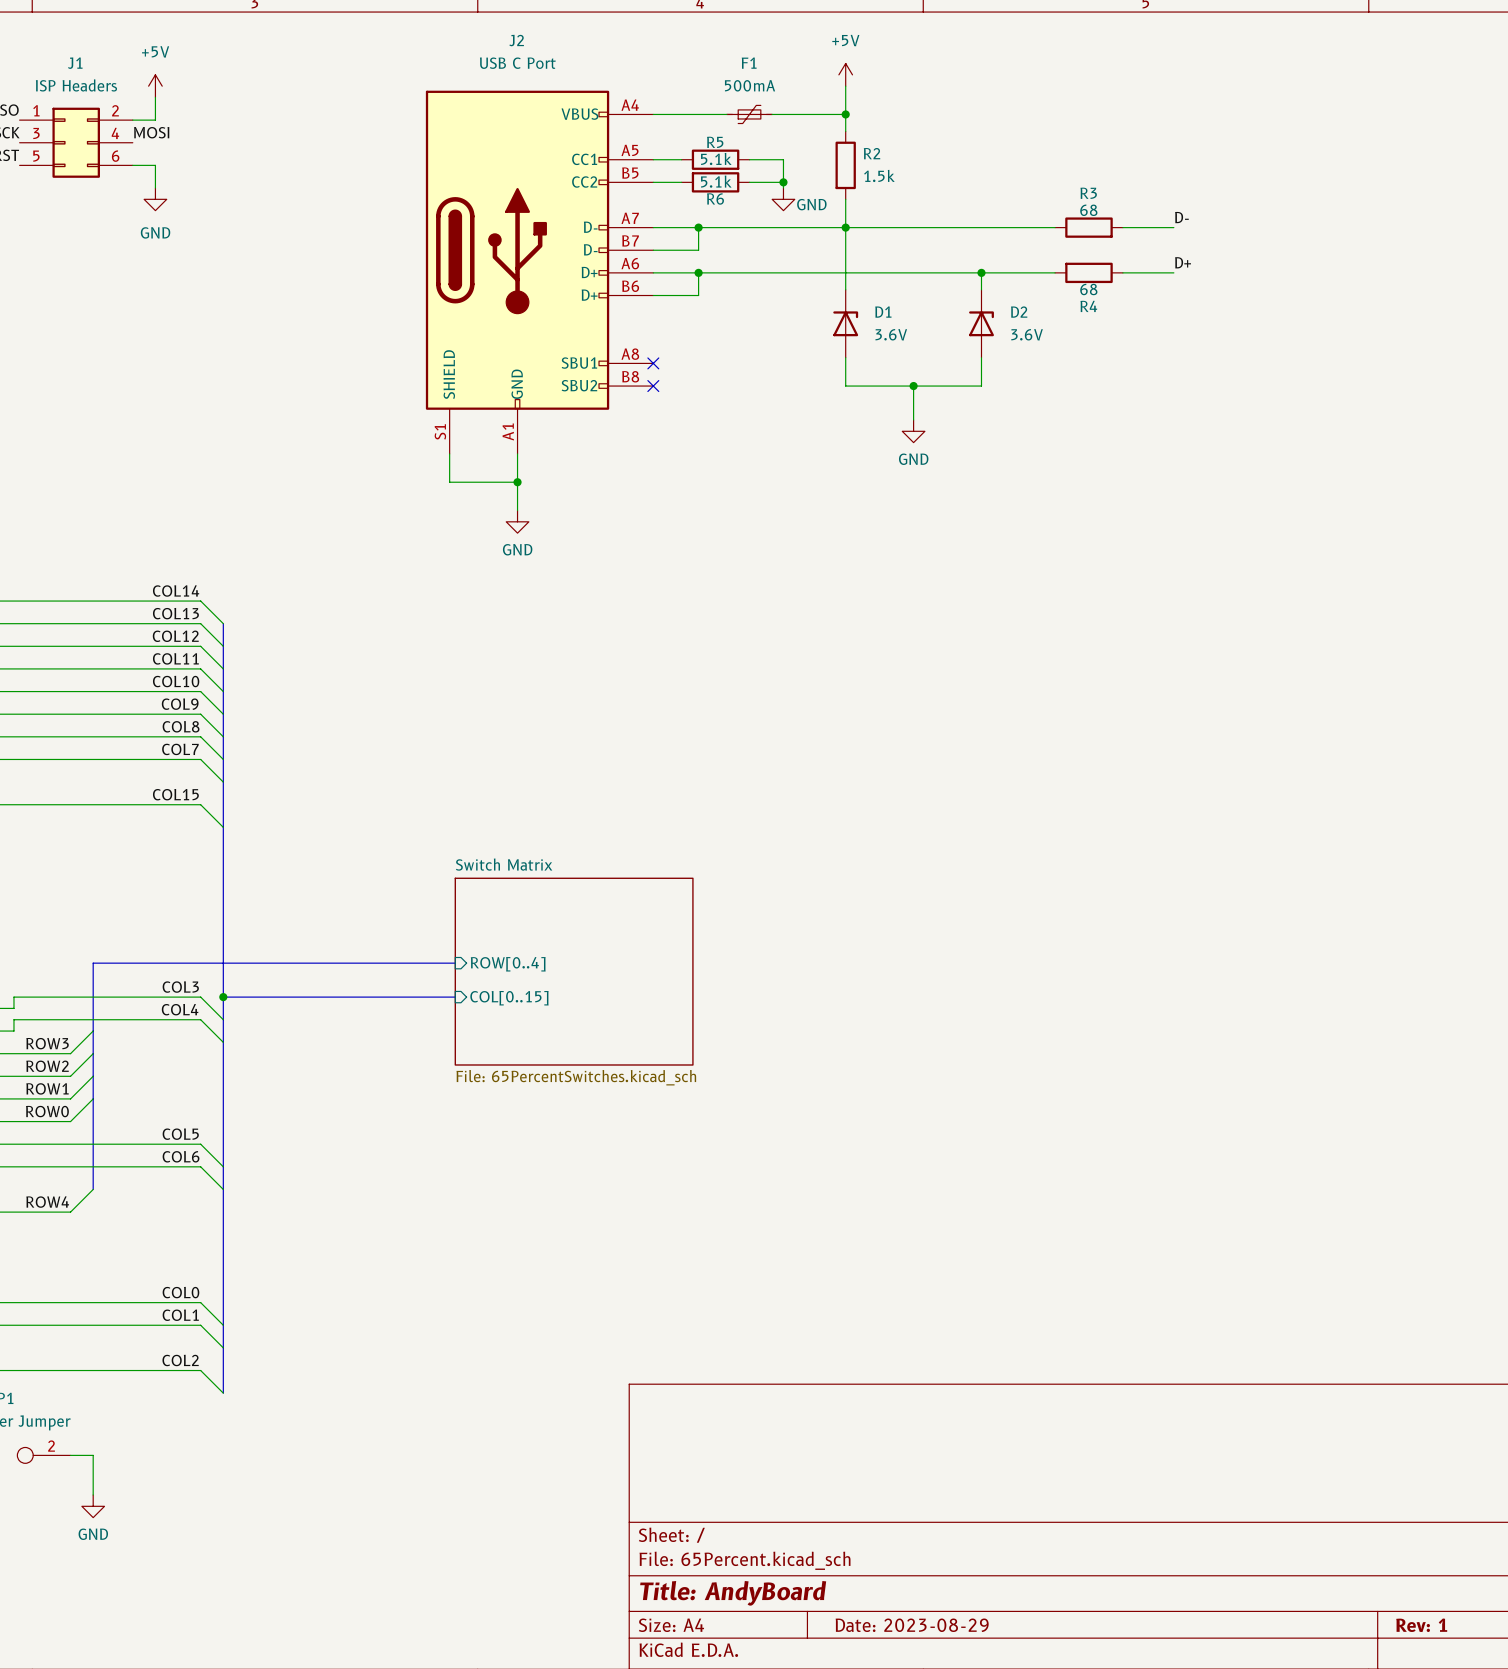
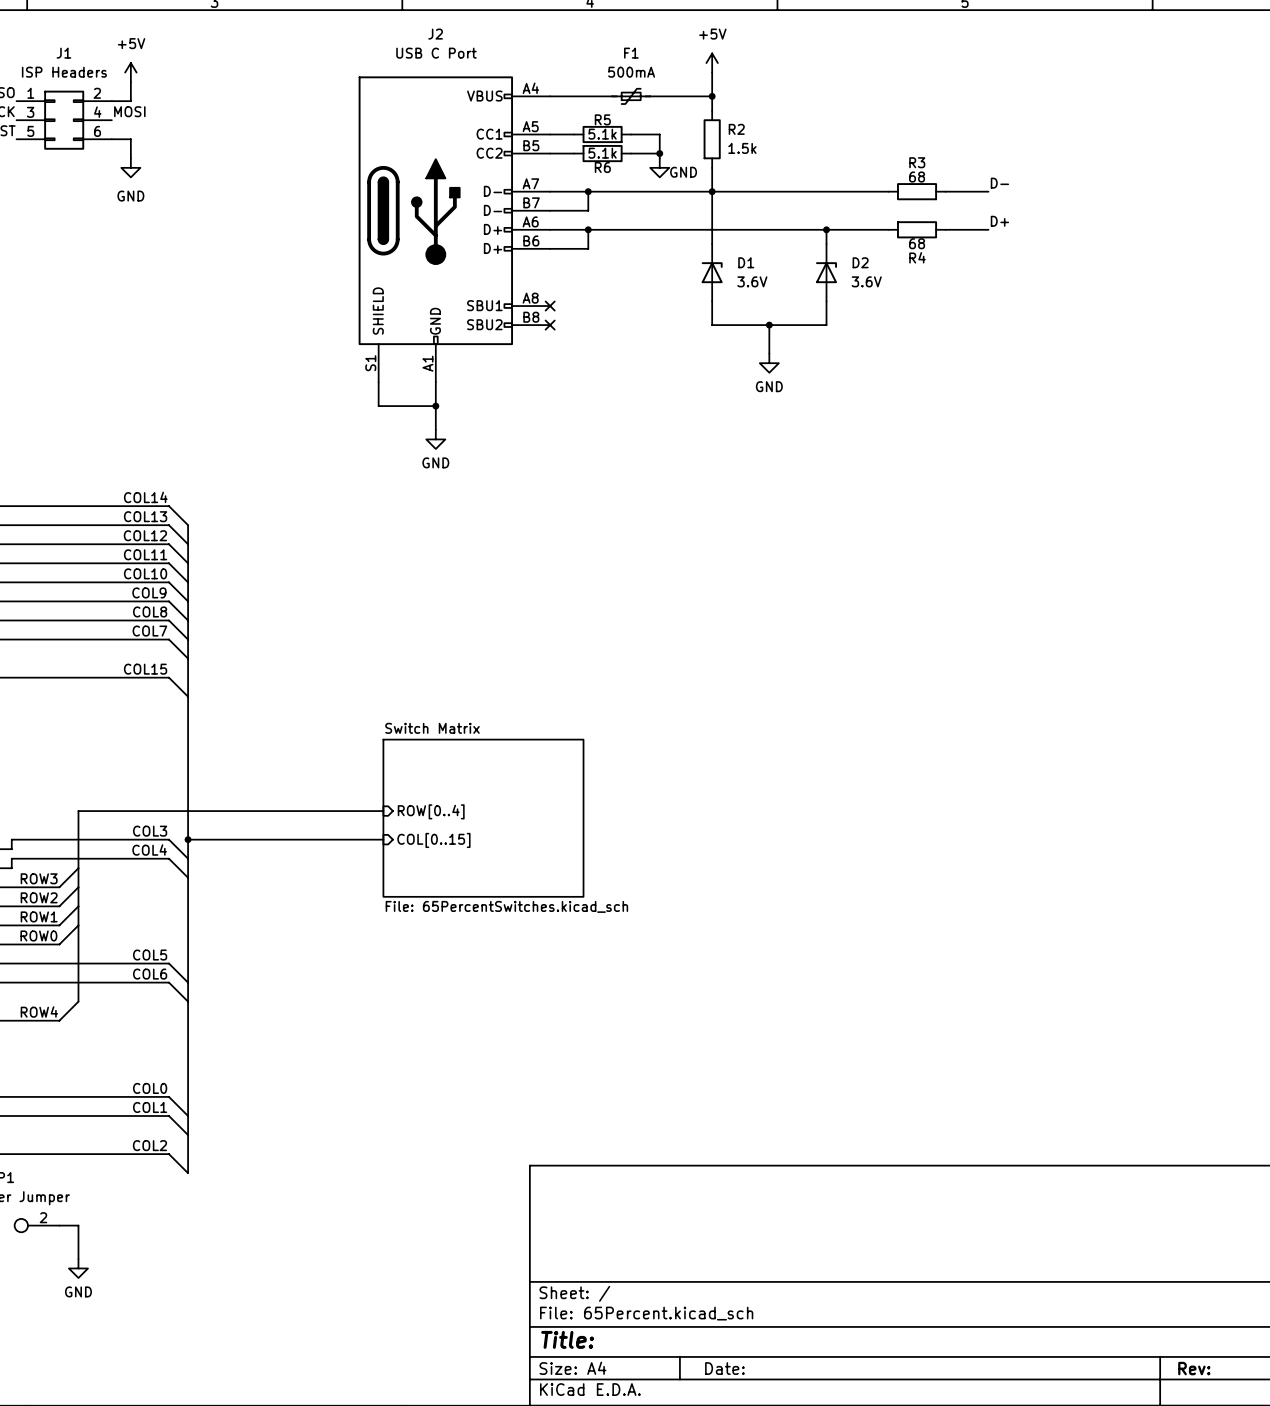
title block: Title: AndyBoard (733, 1593) -> Title: (567, 1339)
title block: Date: 2023-08-29 (912, 1625) -> Date: (724, 1368)
title block: Rev: 1 (1421, 1625) -> Rev: (1194, 1368)

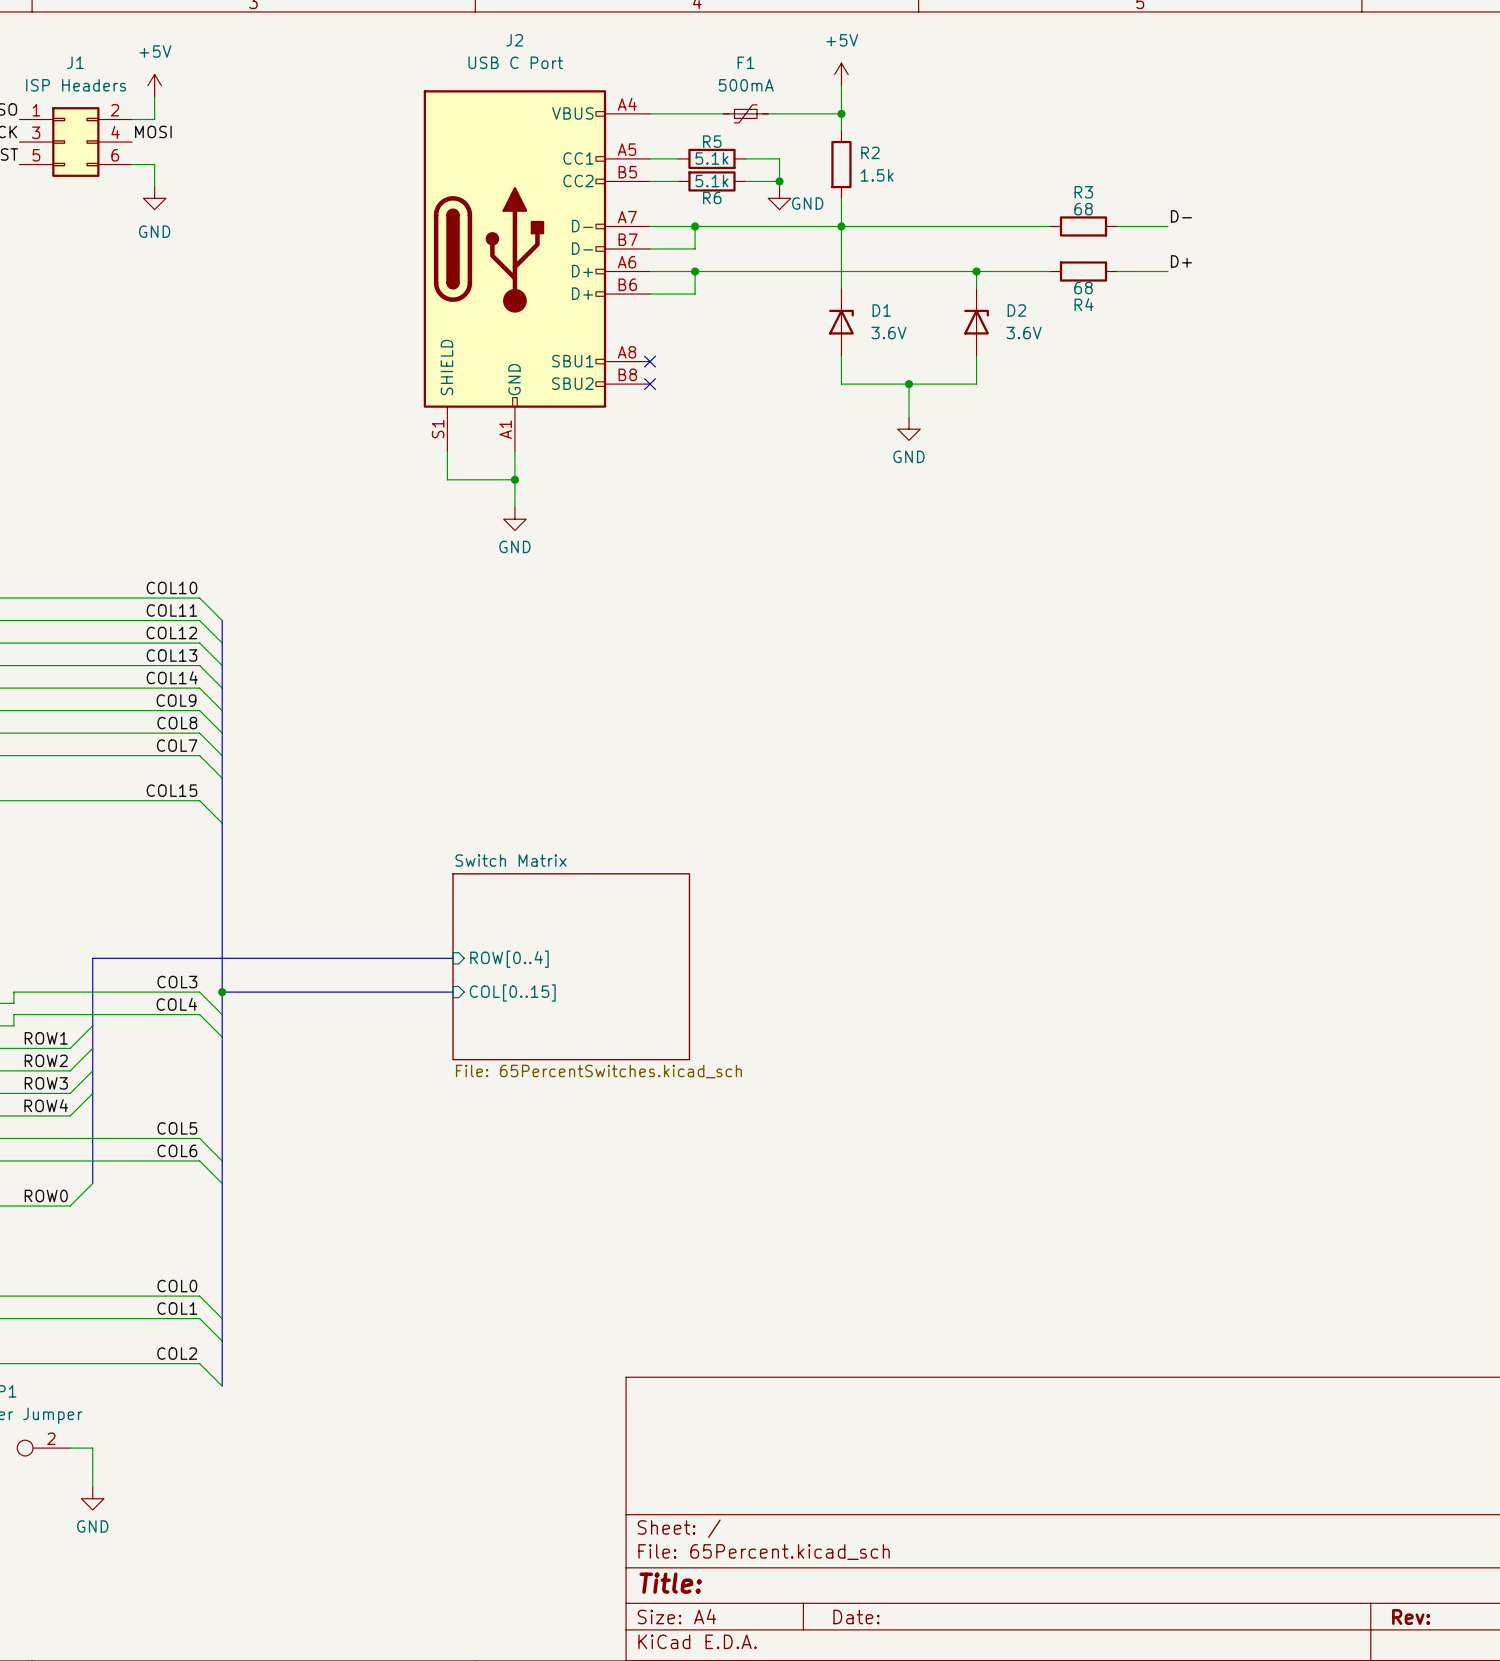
label: COL14 (145, 497) -> COL10 (171, 587)
label: COL13 (145, 516) -> COL11 (171, 610)
label: COL11 (145, 554) -> COL13 (171, 655)
label: COL10 (145, 573) -> COL14 (172, 677)
label: ROW3 (39, 878) -> ROW1 (46, 1038)
label: ROW1 (39, 916) -> ROW3 (46, 1083)
label: ROW0 (38, 935) -> ROW4 (46, 1105)
label: ROW4 (39, 1011) -> ROW0 (46, 1195)

